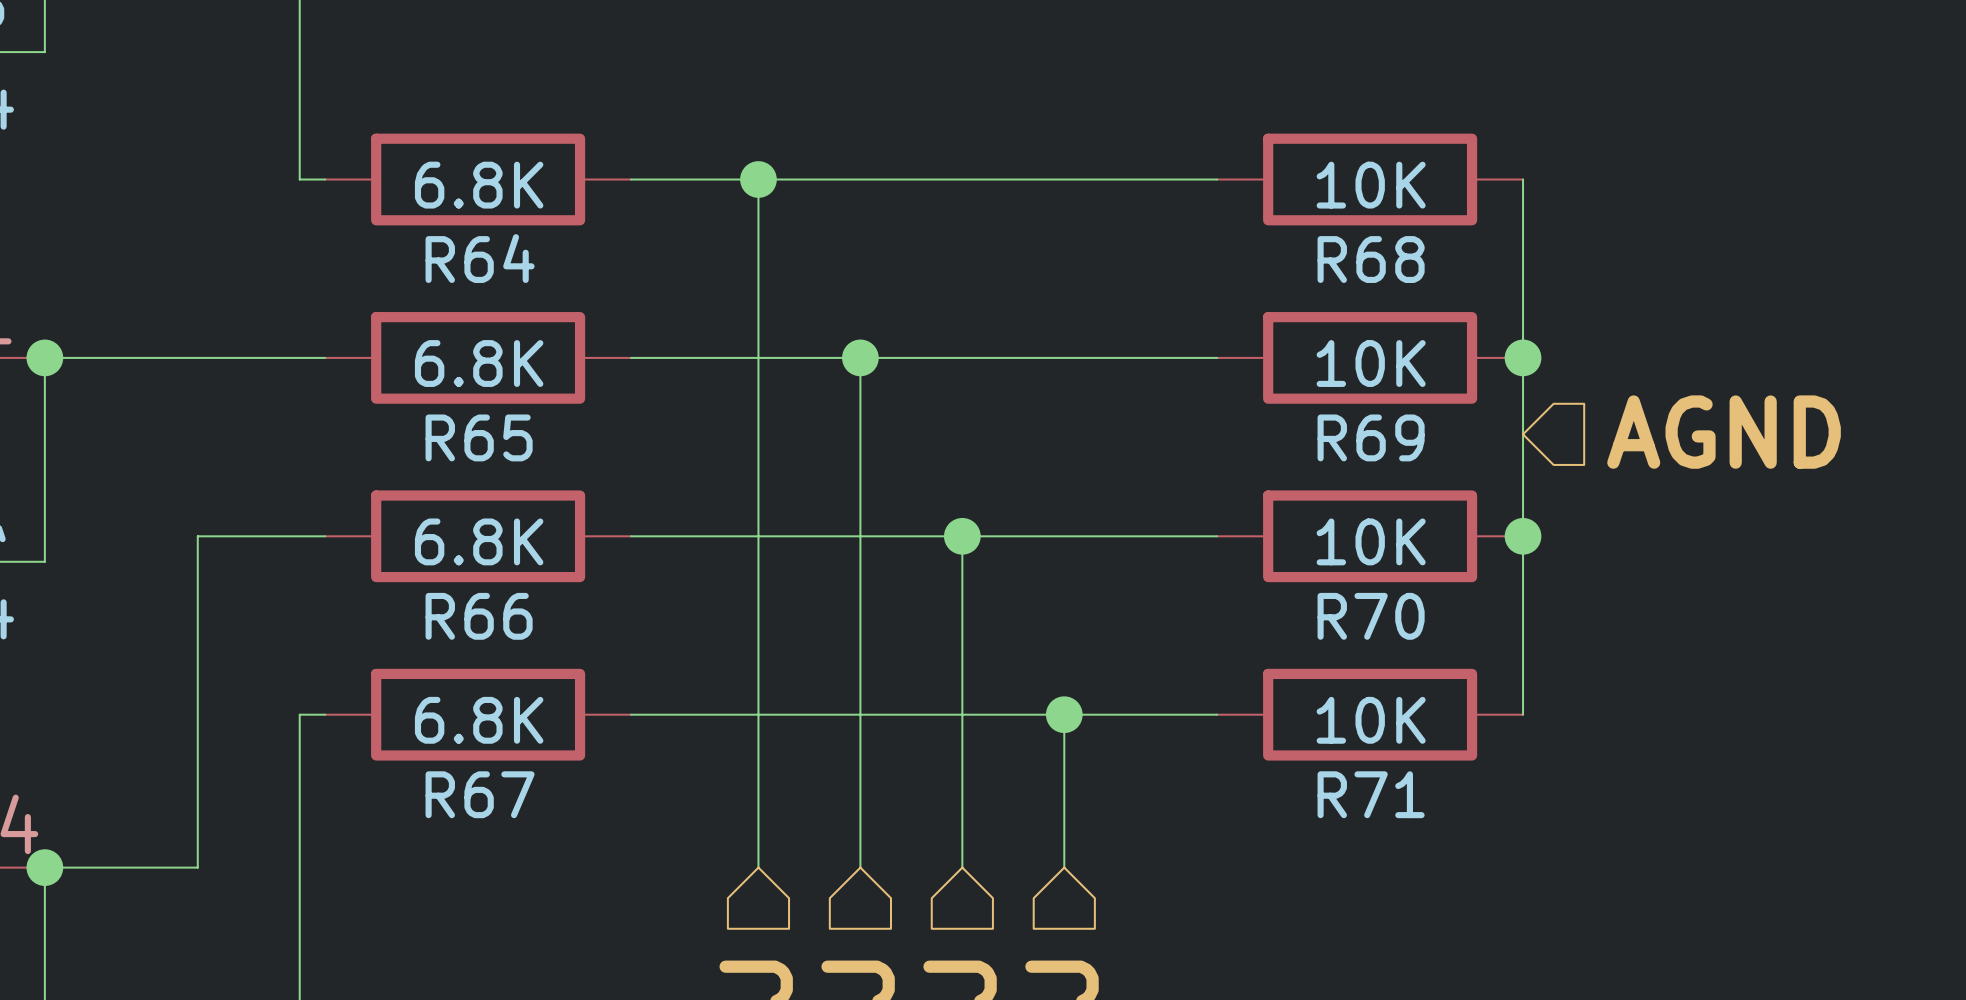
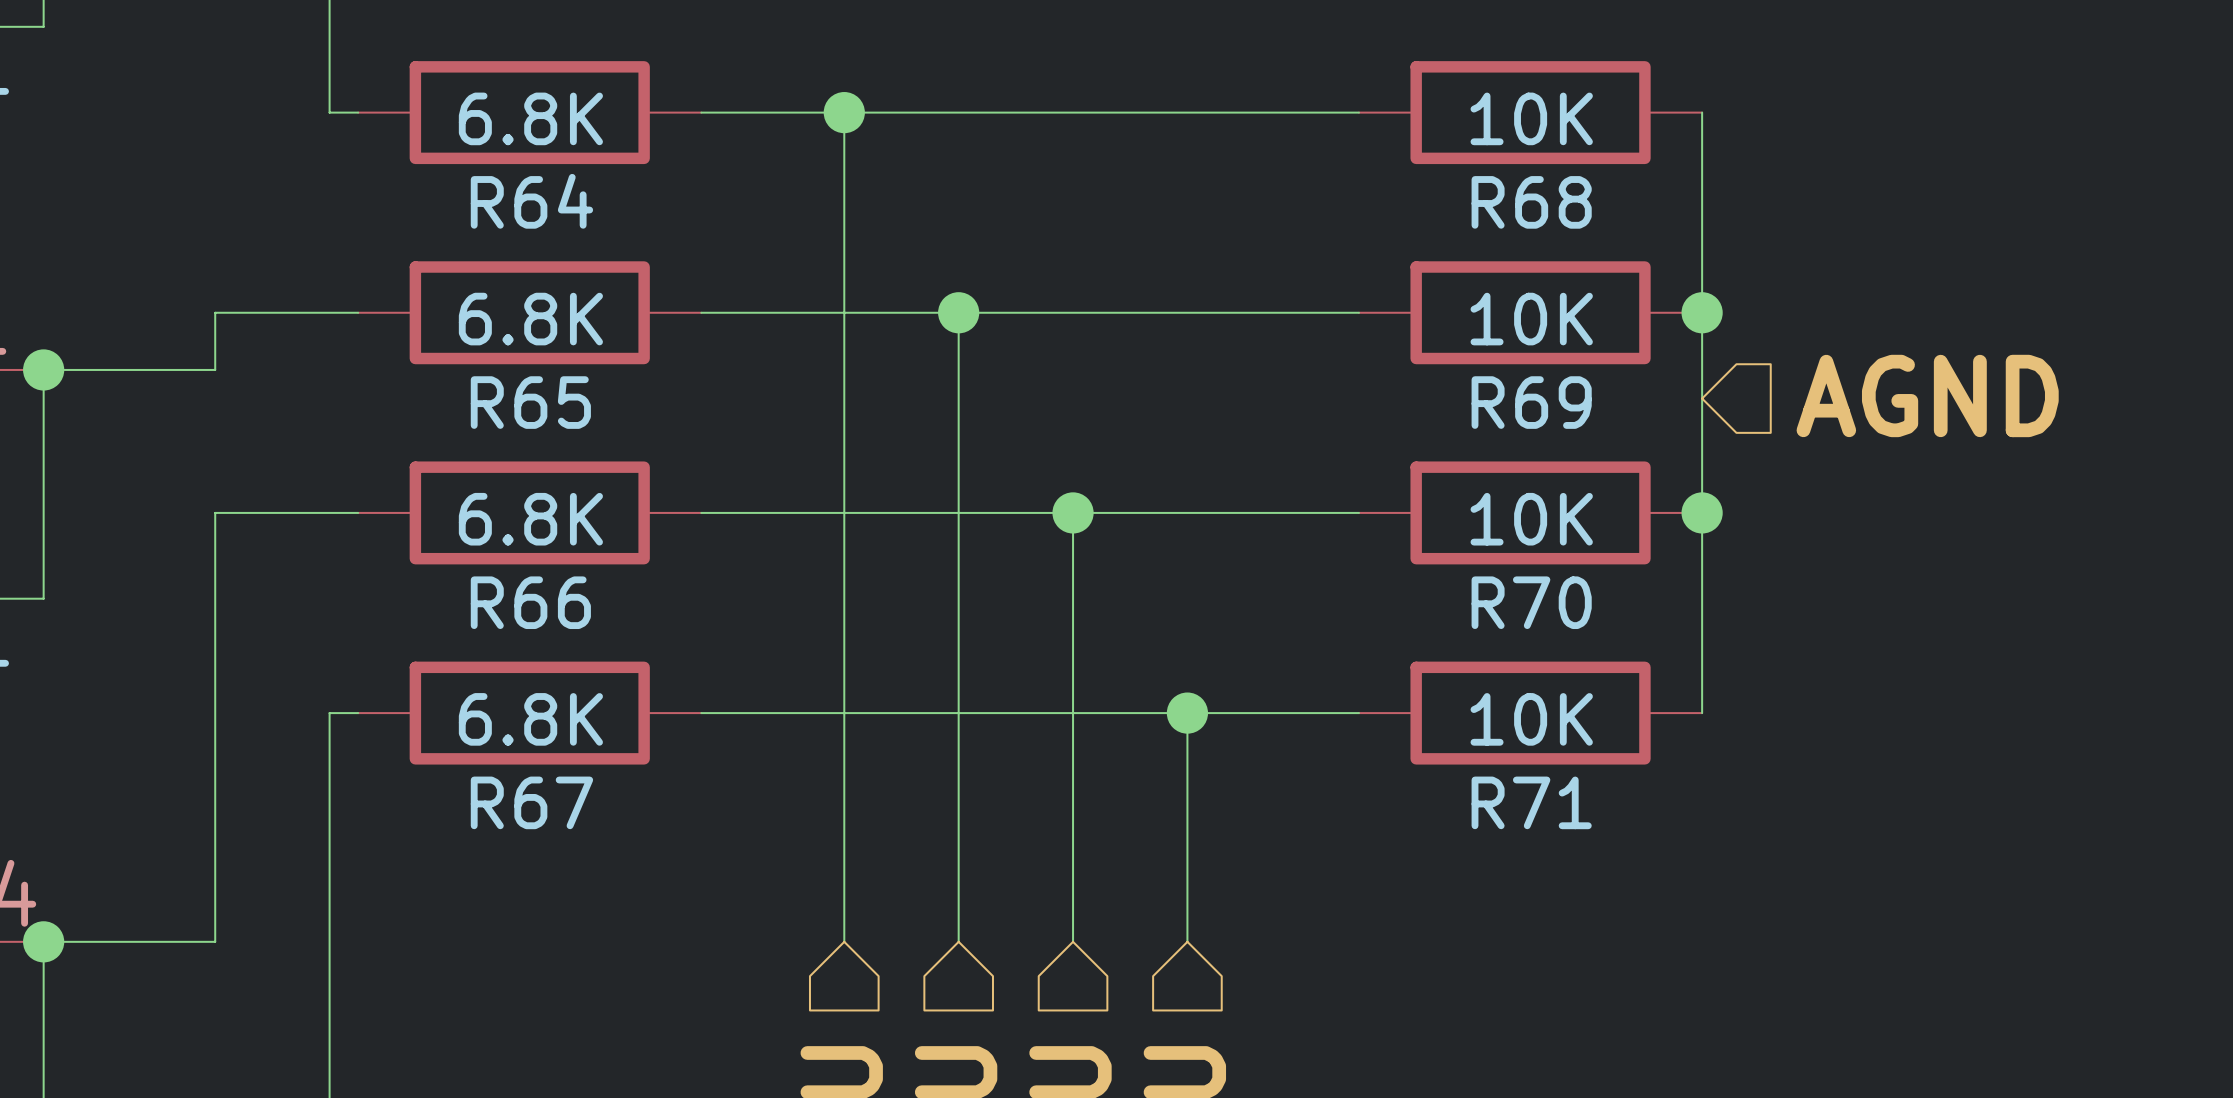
wire: (299, 128) (299, 179) (325, 179) -> (329, 112) (358, 112)
wire: none -> (844, 112) (844, 169)
wire: none -> (1702, 112) (1702, 169)
R64 position: (478, 179) -> (529, 112)
wire: (631, 179) (1217, 179) -> (701, 112) (1358, 112)
junction position: (758, 179) -> (844, 112)
R68 position: (1370, 179) -> (1530, 112)
wire: none -> (958, 312) (958, 369)
wire: (197, 357) (325, 357) -> (215, 369) (215, 312) (358, 312)
R65 position: (478, 357) -> (529, 312)
wire: (631, 357) (1217, 357) -> (701, 312) (1358, 312)
junction position: (860, 357) -> (958, 312)
R69 position: (1370, 357) -> (1530, 312)
junction position: (1523, 357) -> (1702, 312)
hierarchical label position: AGND (1724, 432) -> AGND (1927, 395)
wire: none -> (1073, 512) (1073, 570)
wire: (197, 536) (325, 536) -> (215, 570) (215, 512) (358, 512)
R66 position: (478, 536) -> (529, 512)
wire: (631, 536) (1217, 536) -> (701, 512) (1358, 512)
junction position: (962, 536) -> (1073, 512)
R70 position: (1370, 536) -> (1530, 512)
junction position: (1523, 536) -> (1702, 512)
wire: (1523, 663) (1523, 714) -> (1187, 713) (1187, 770)
wire: (299, 714) (325, 714) -> (329, 770) (329, 713) (358, 713)
R67 position: (478, 714) -> (529, 713)
wire: (631, 714) (1217, 714) -> (701, 713) (1358, 713)
junction position: (1064, 714) -> (1187, 713)
R71 position: (1370, 714) -> (1530, 713)

